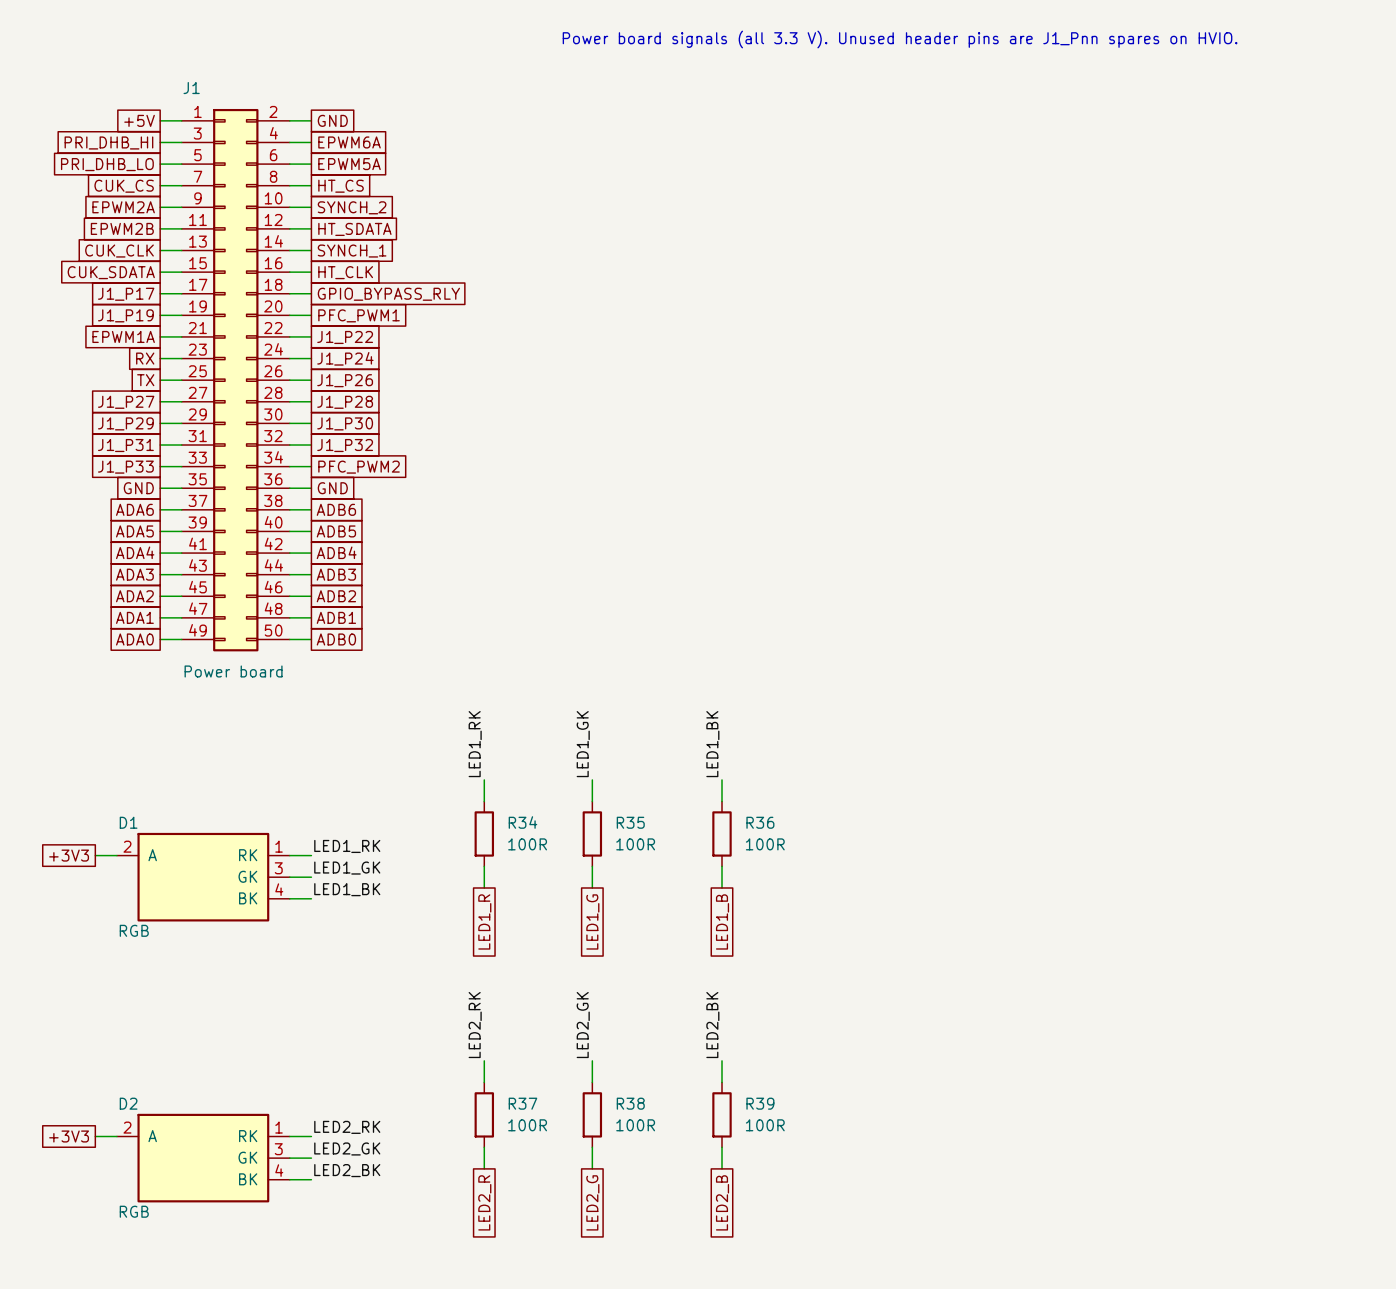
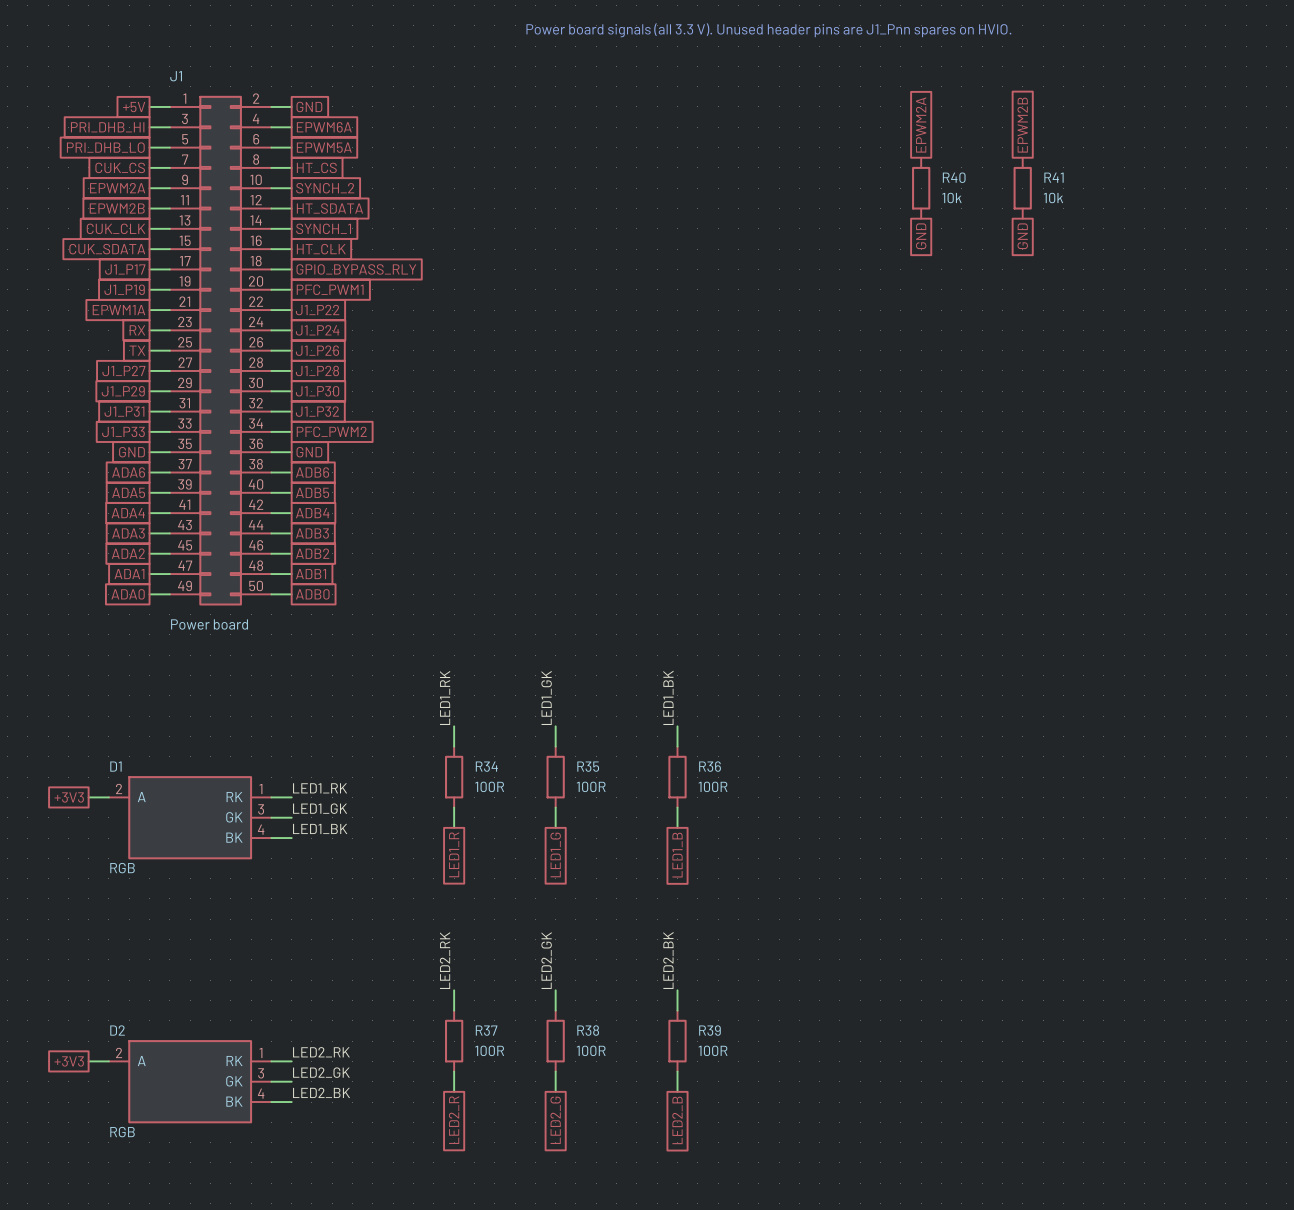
global label: none -> EPWM2A (921, 125)
global label: none -> EPWM2B (1022, 125)
R40: none -> 10k (921, 188)
R41: none -> 10k (1022, 188)
global label: none -> GND (921, 236)
global label: none -> GND (1022, 236)

